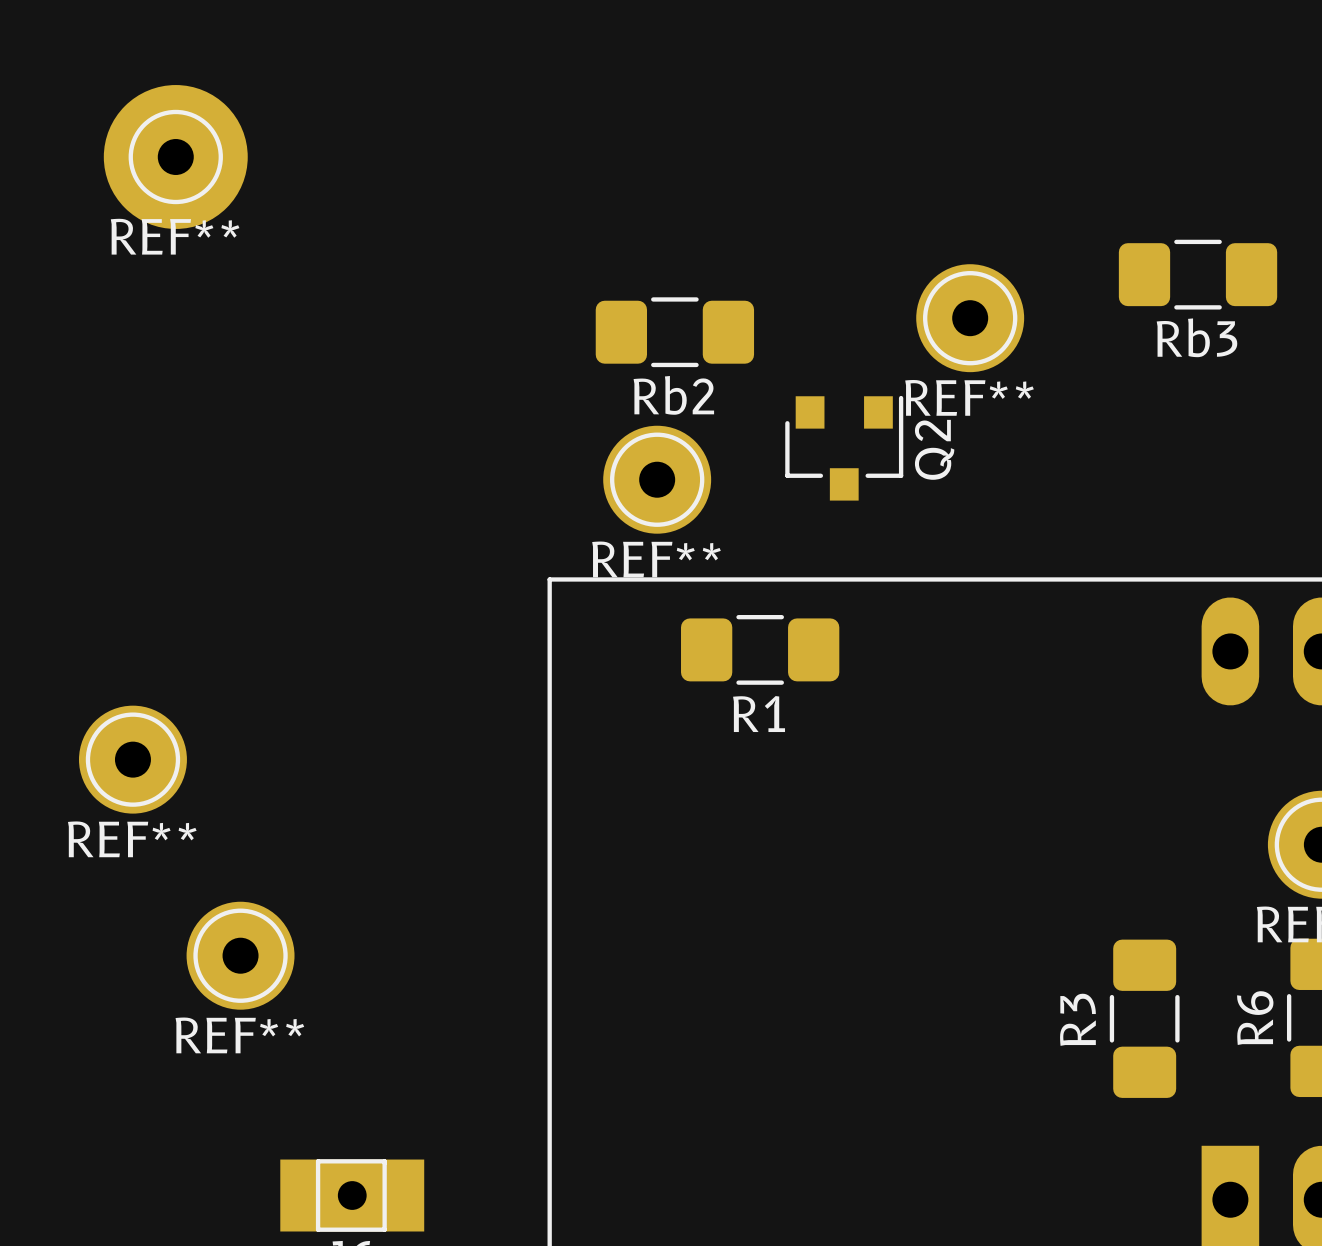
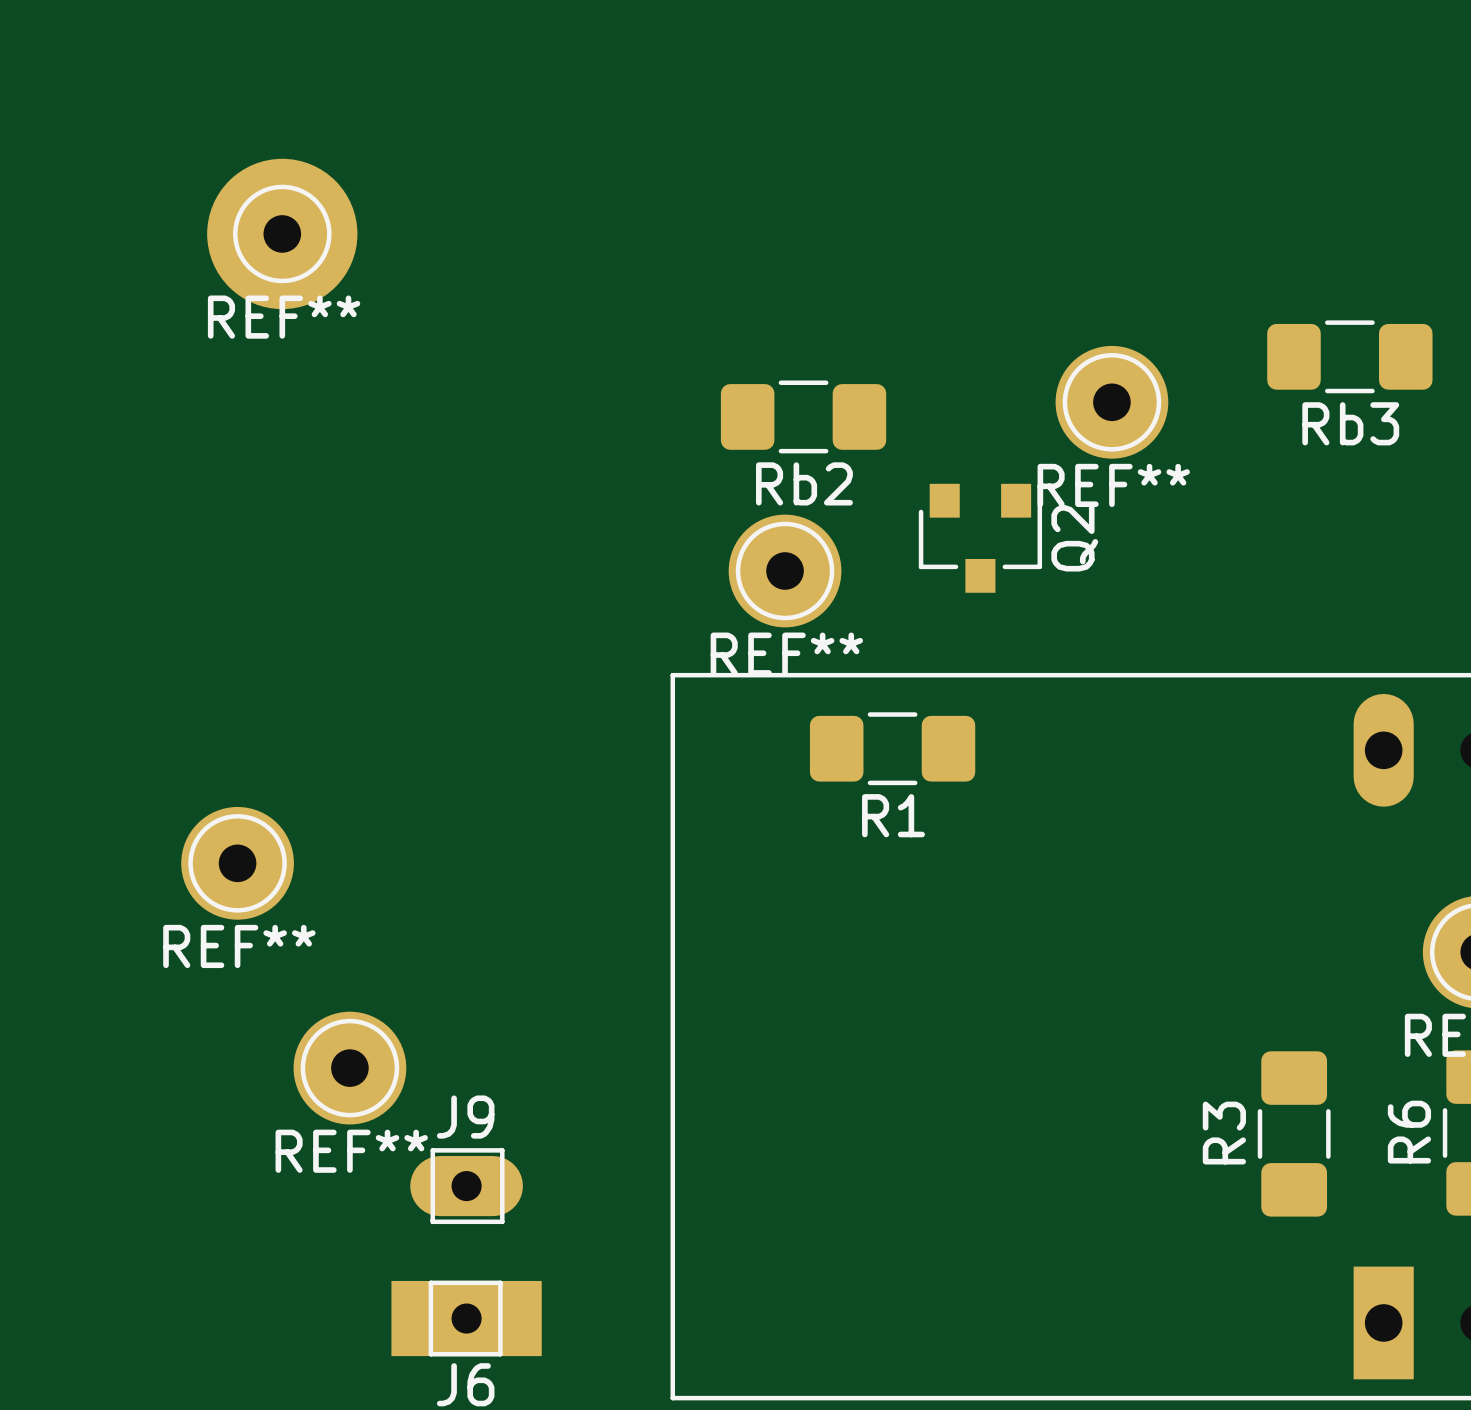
J9: none -> (466, 1186)

